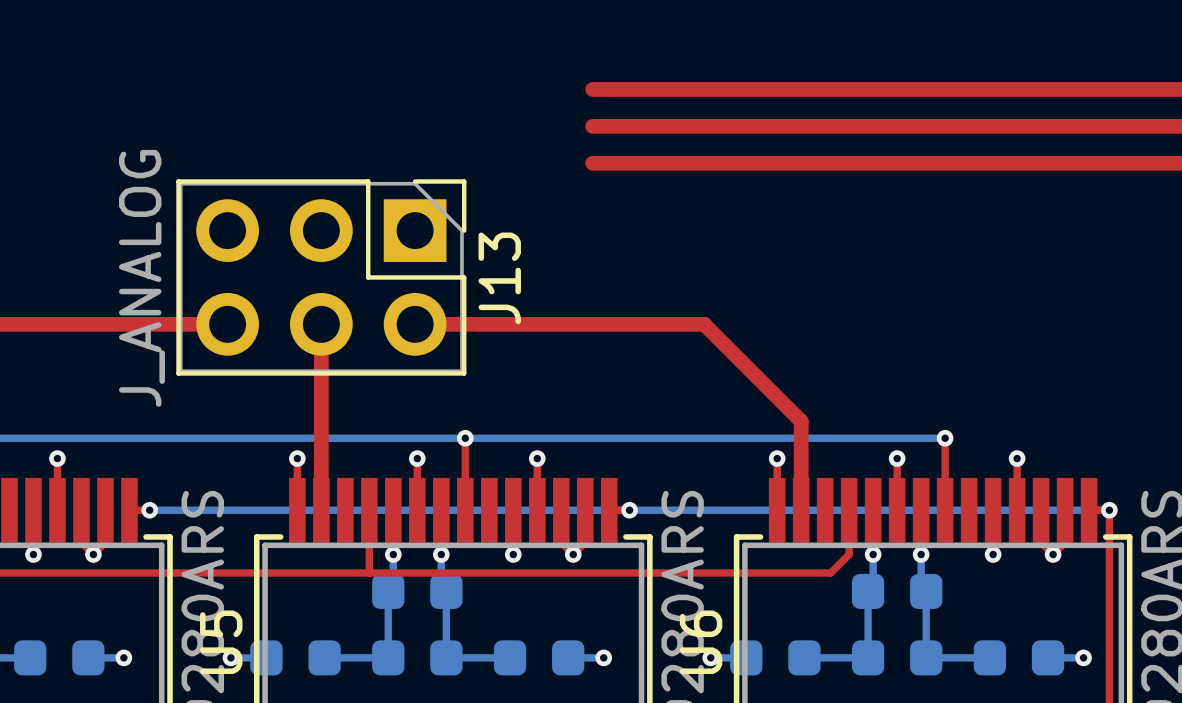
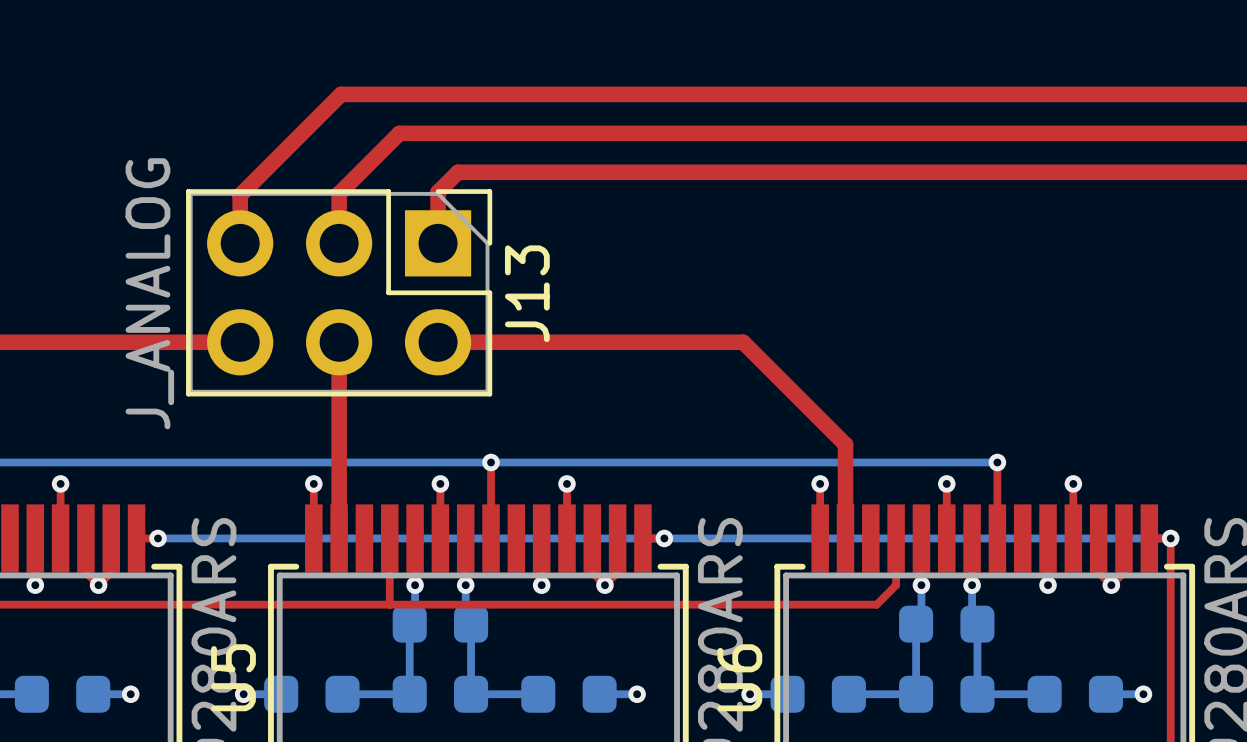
top track: none -> (625, 94) (341, 94) (240, 195) (240, 243)
top track: none -> (625, 133) (399, 133) (339, 193) (339, 243)
top track: none -> (625, 172) (457, 172) (438, 192) (438, 243)

